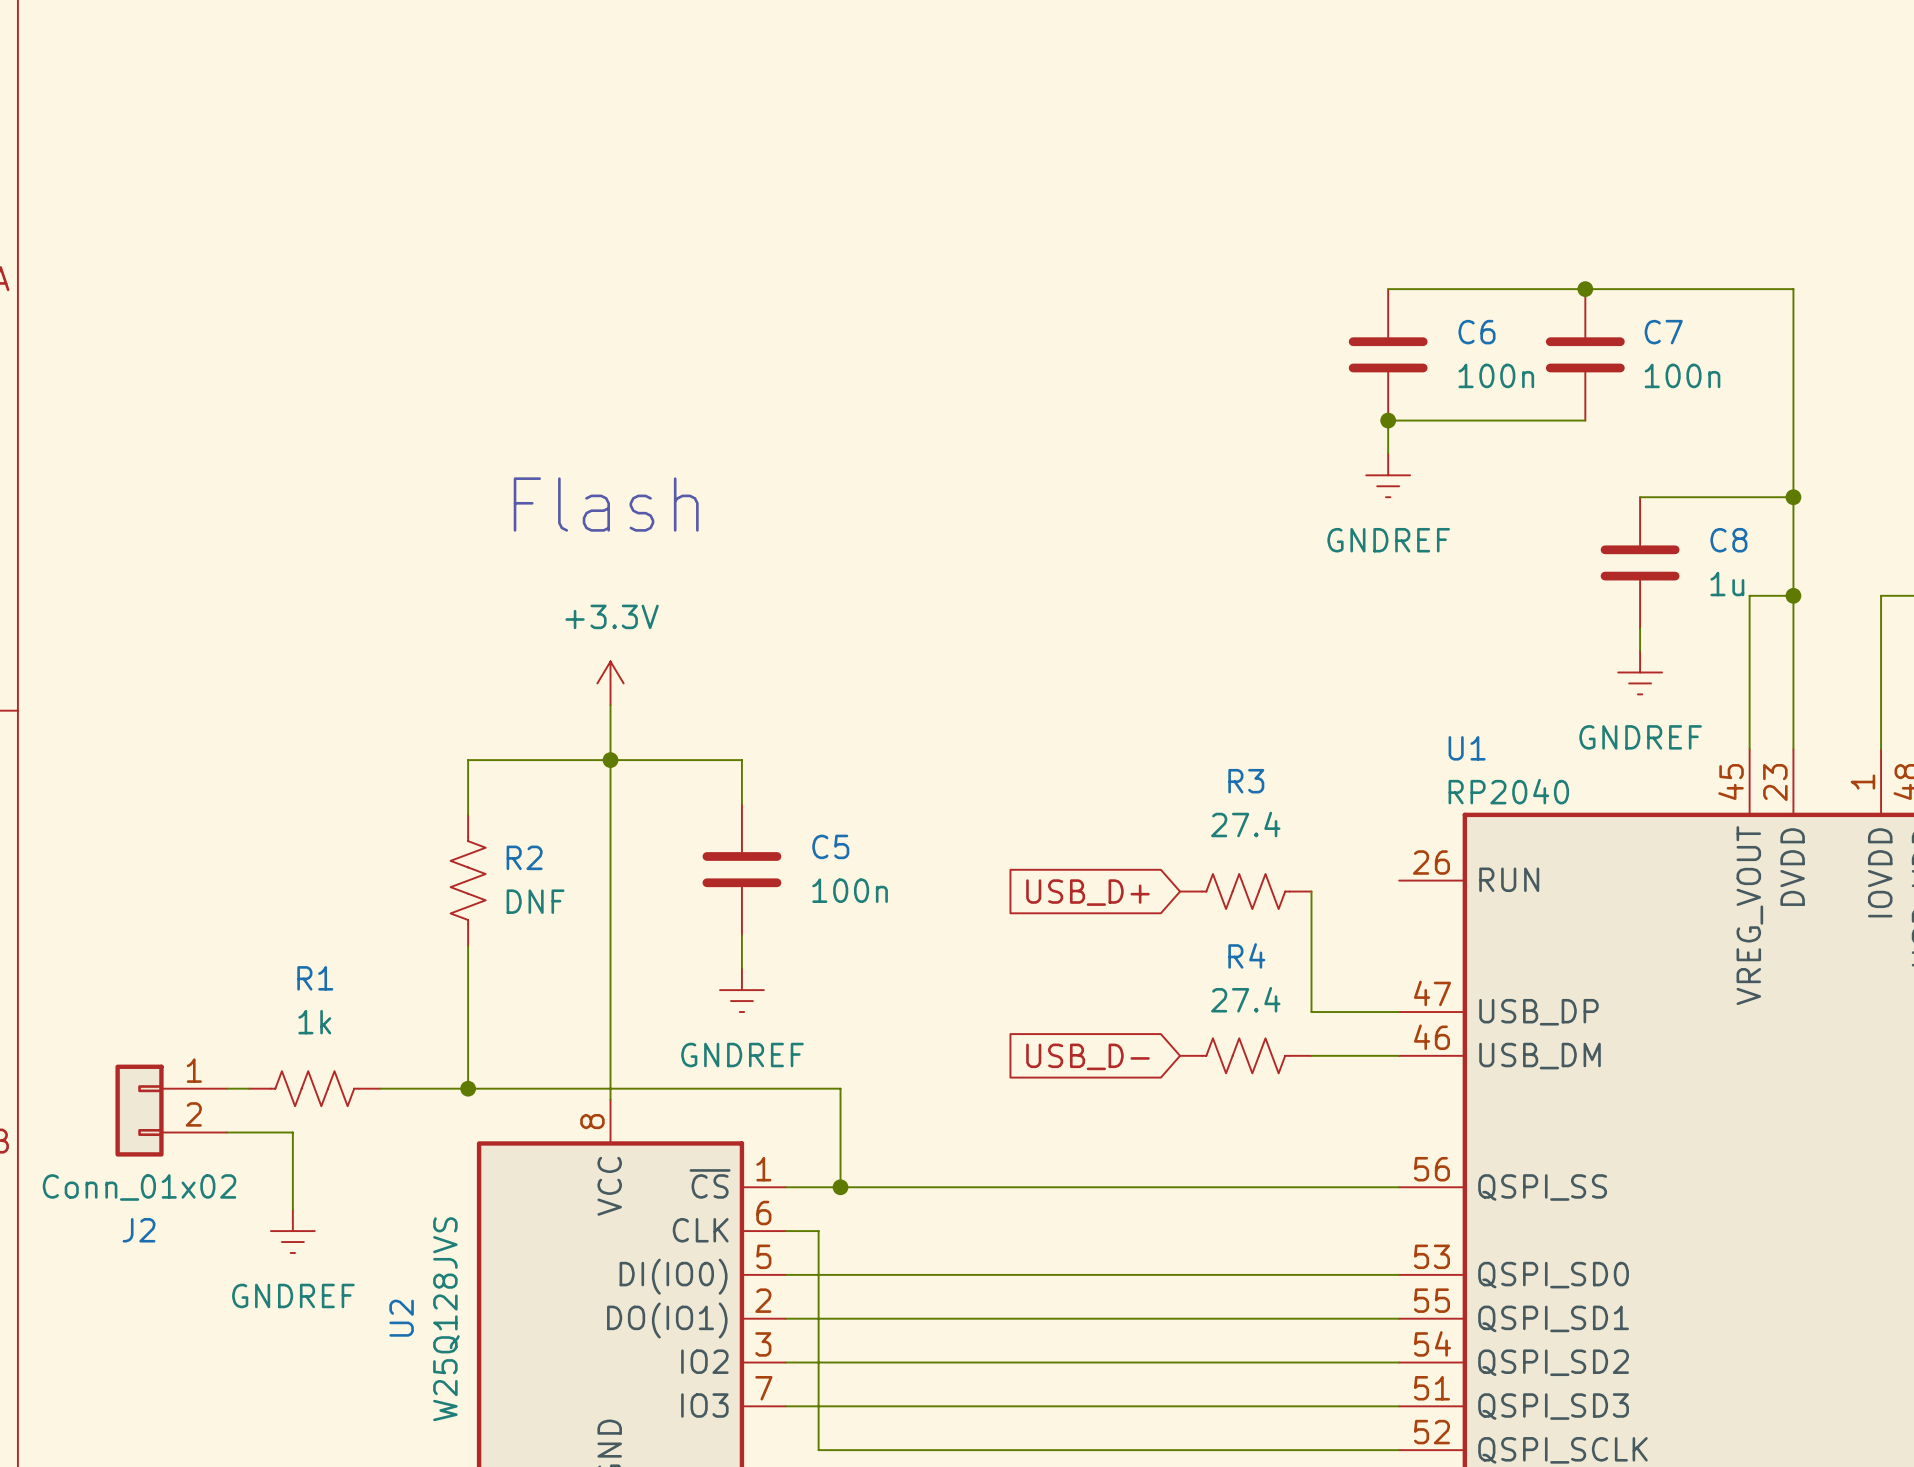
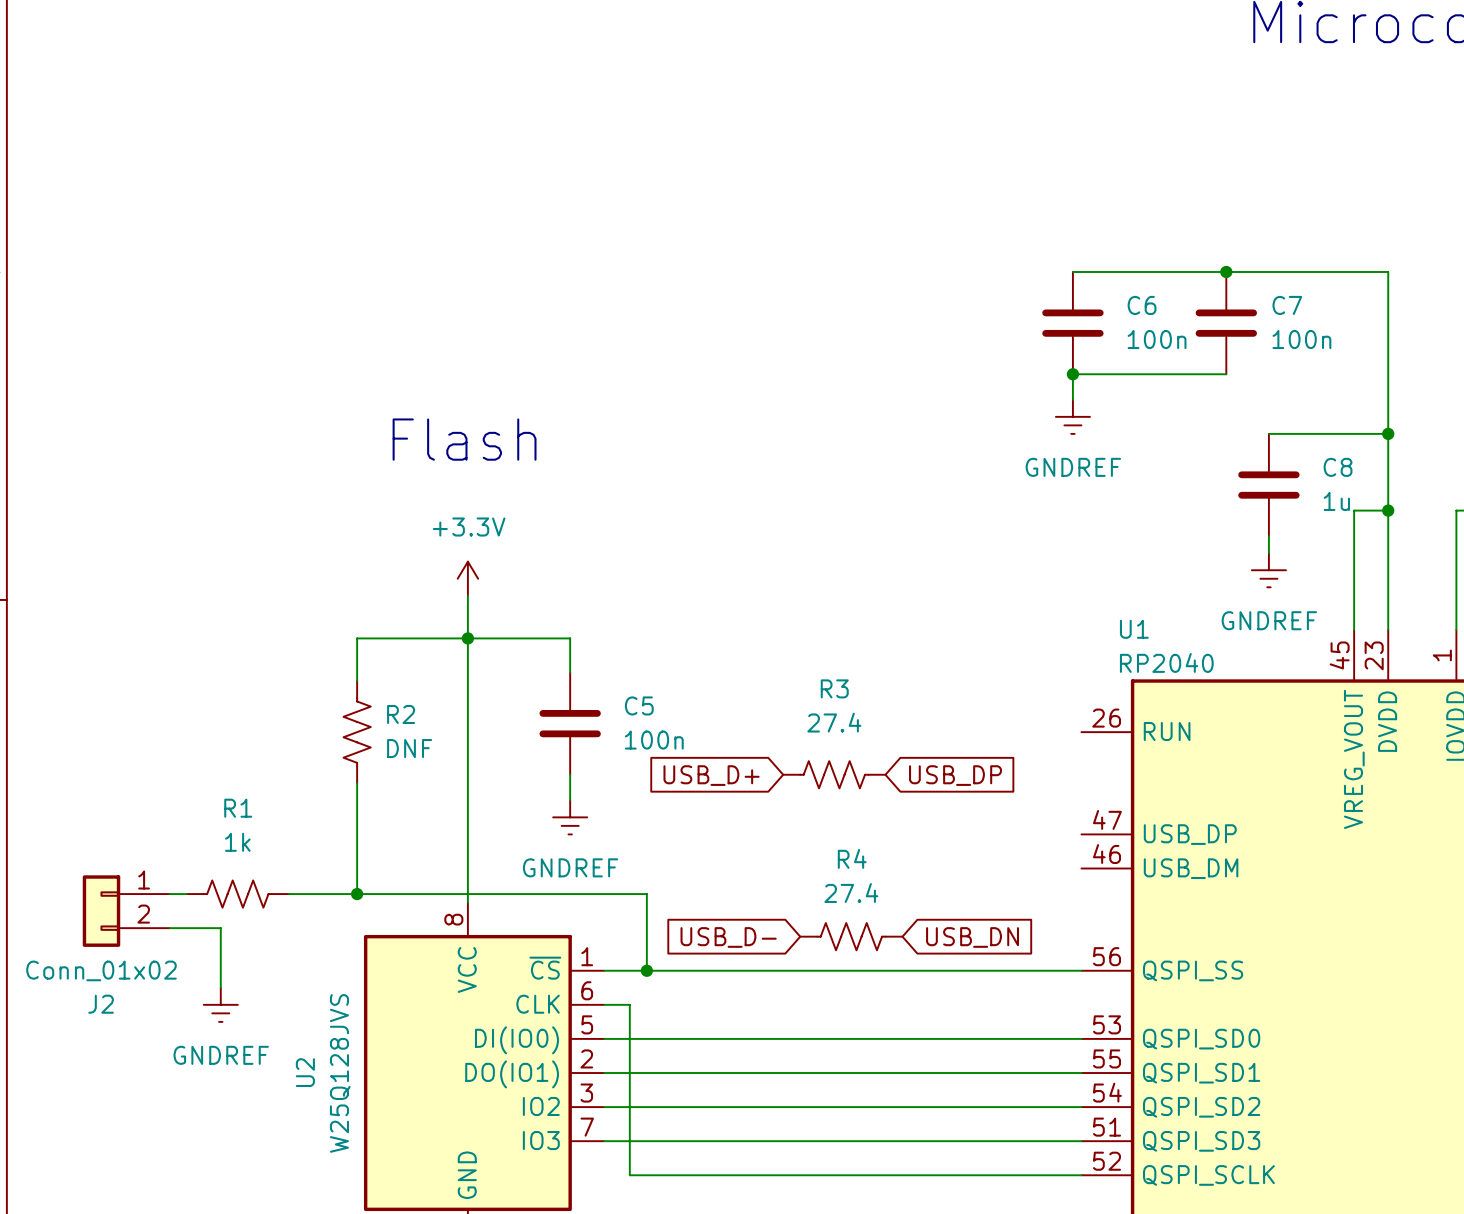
R3 position: (1245, 891) -> (834, 774)
wire: (1311, 891) (1311, 1012) (1399, 1012) -> none
global label position: USB_D+ (1087, 892) -> USB_D+ (711, 775)
global label: none -> USB_DP (955, 775)
R4 position: (1245, 1055) -> (851, 936)
wire: (1311, 1055) (1399, 1055) -> none
global label position: USB_D- (1087, 1056) -> USB_D- (728, 937)
global label: none -> USB_DN (972, 937)

